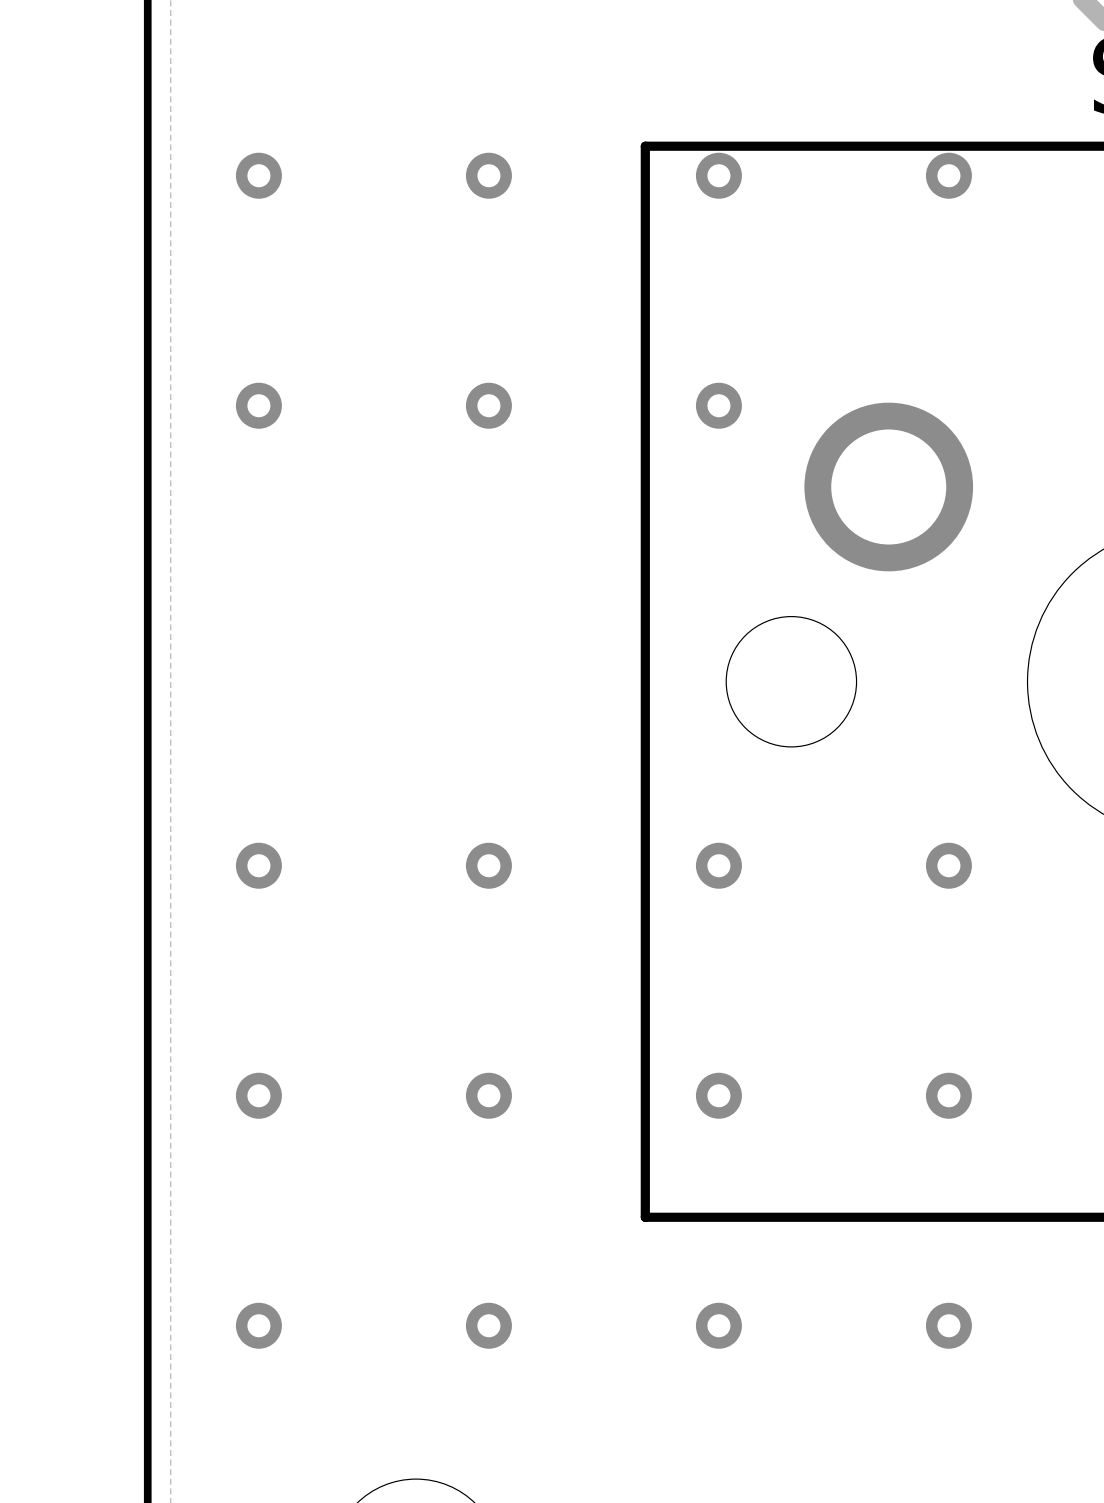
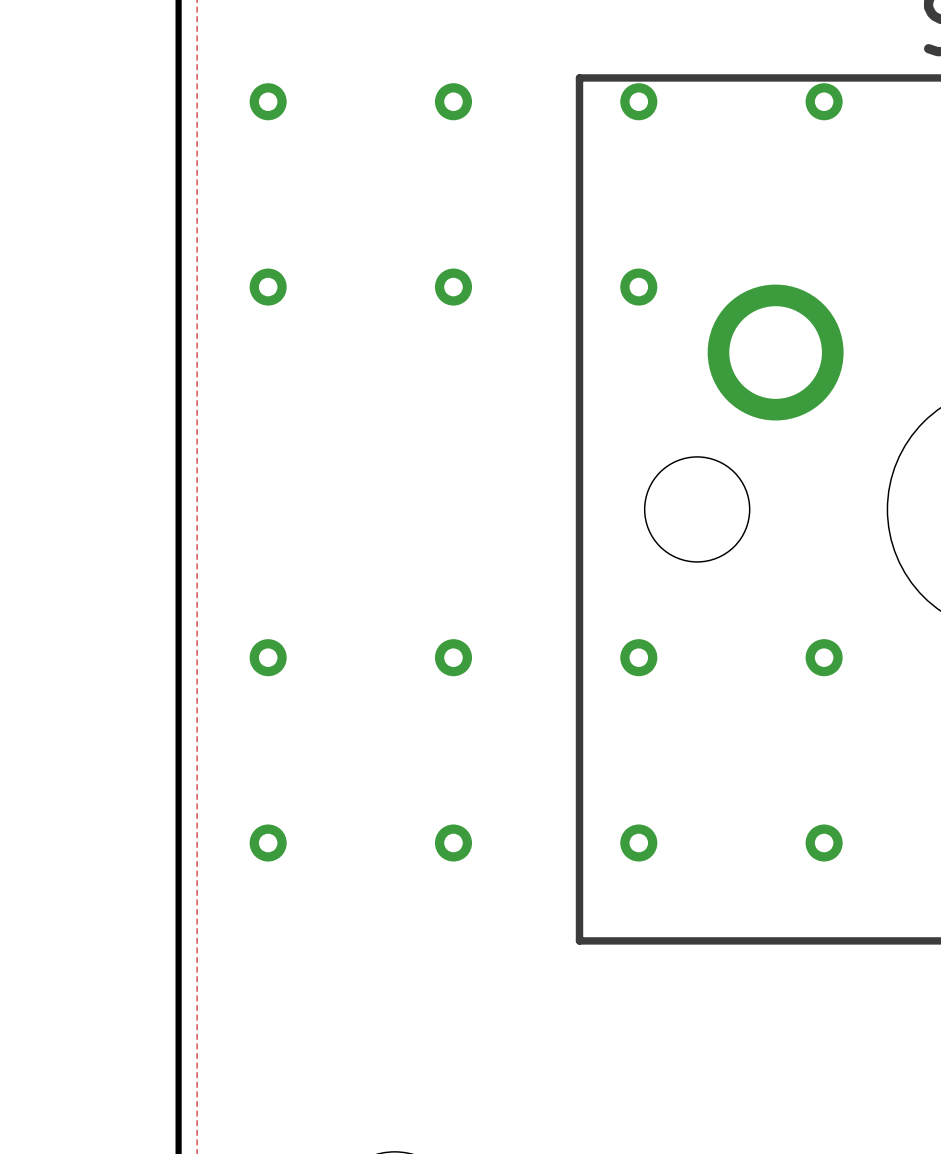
via: (258, 1325) -> none
via: (488, 1325) -> none
via: (718, 1325) -> none
via: (948, 1325) -> none

